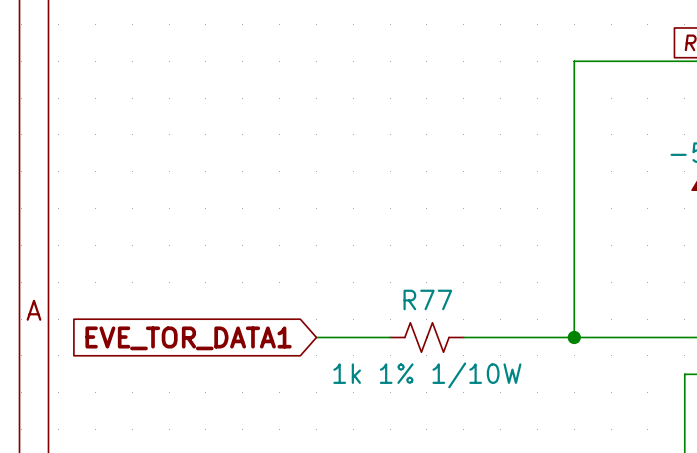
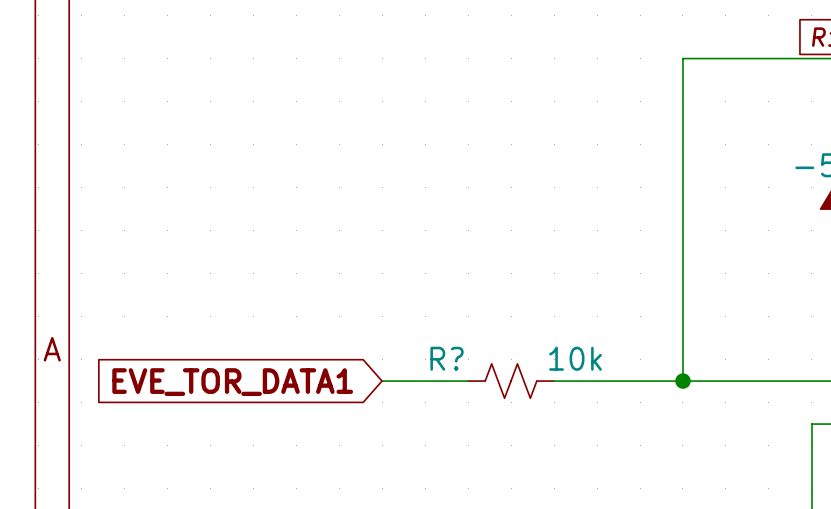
R77 name: R77 (427, 299) -> R? (447, 358)
R77 value: 1k 1% 1/10W (427, 375) -> 10k (575, 358)

